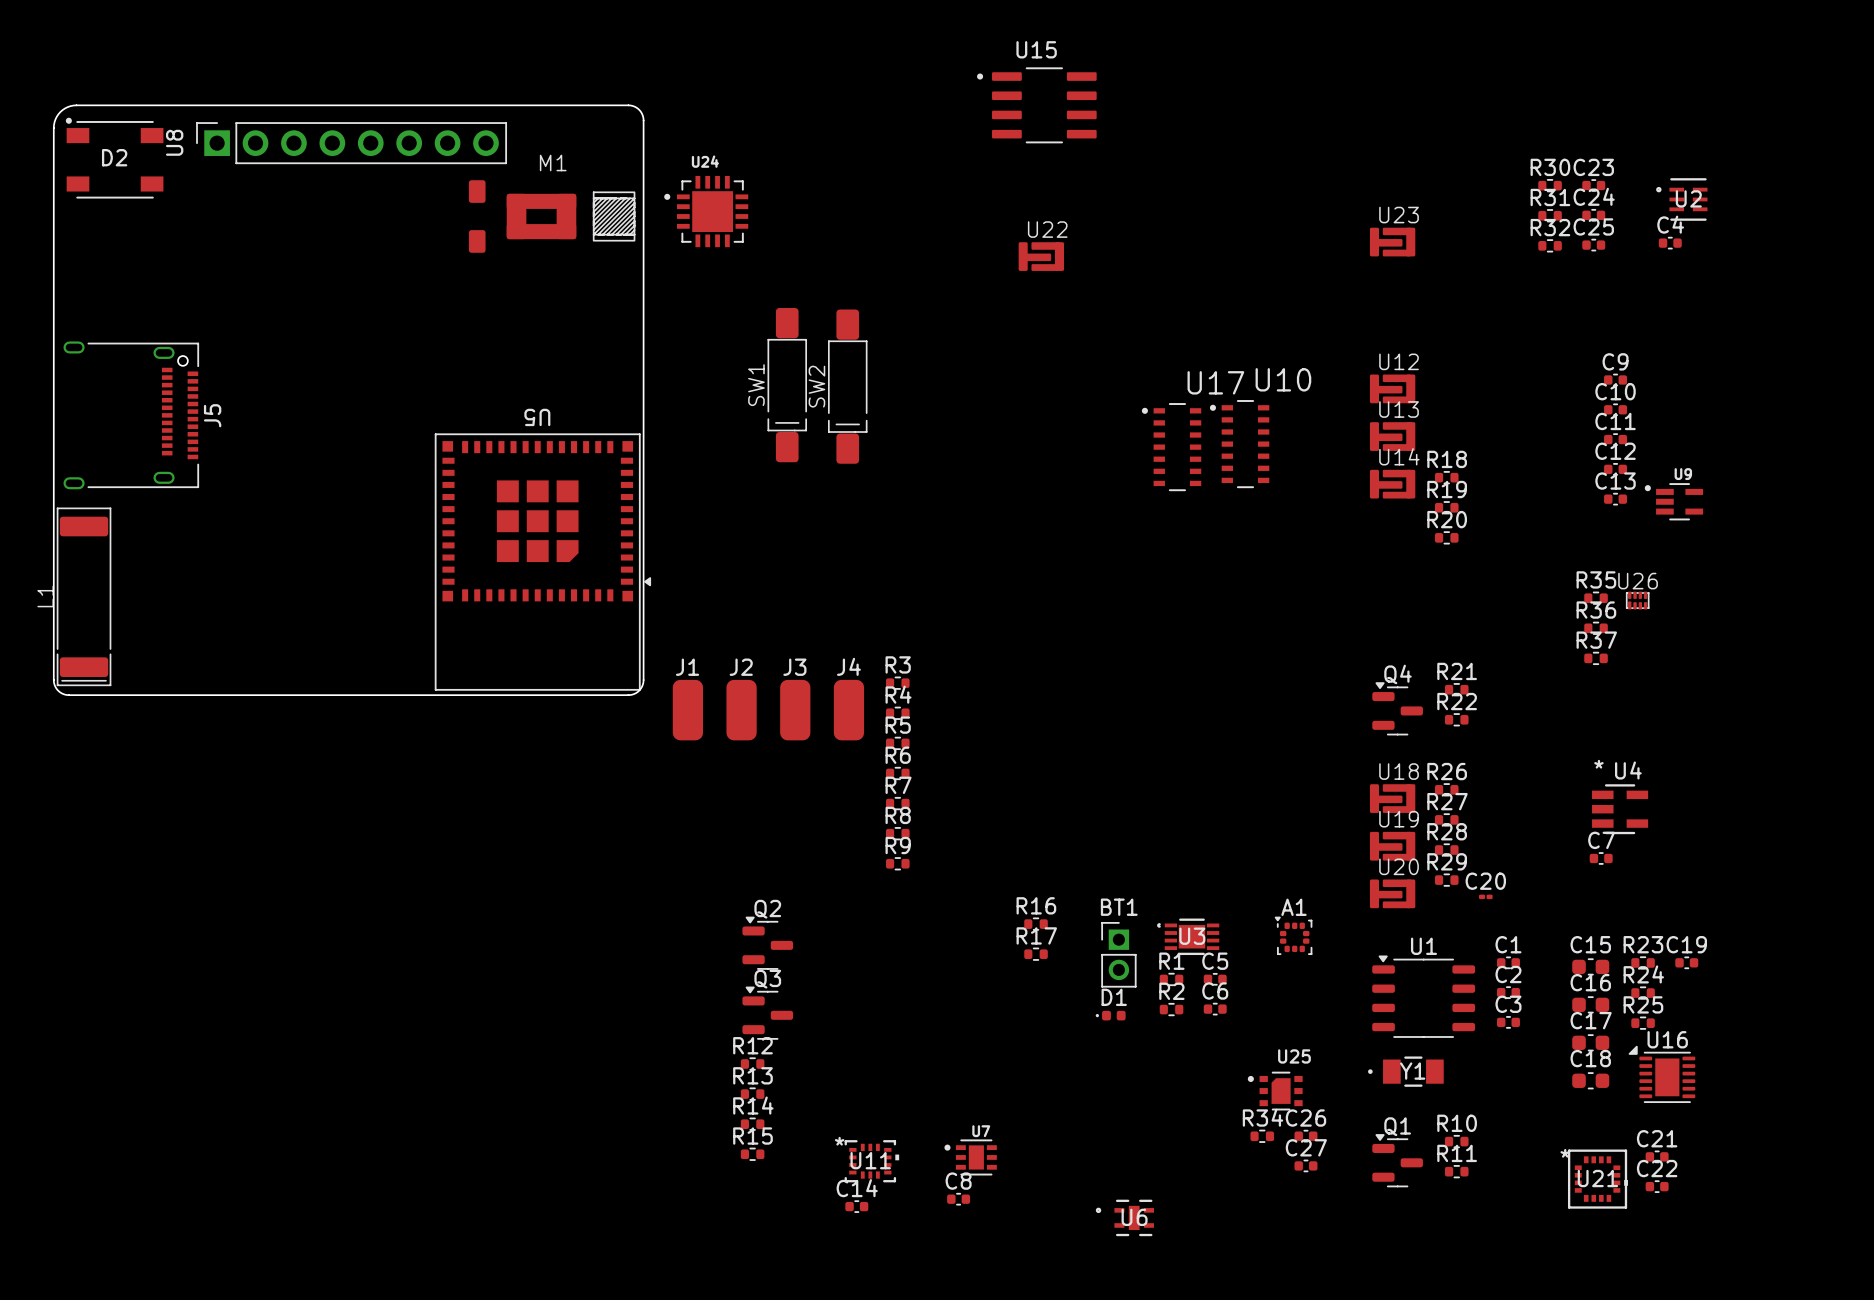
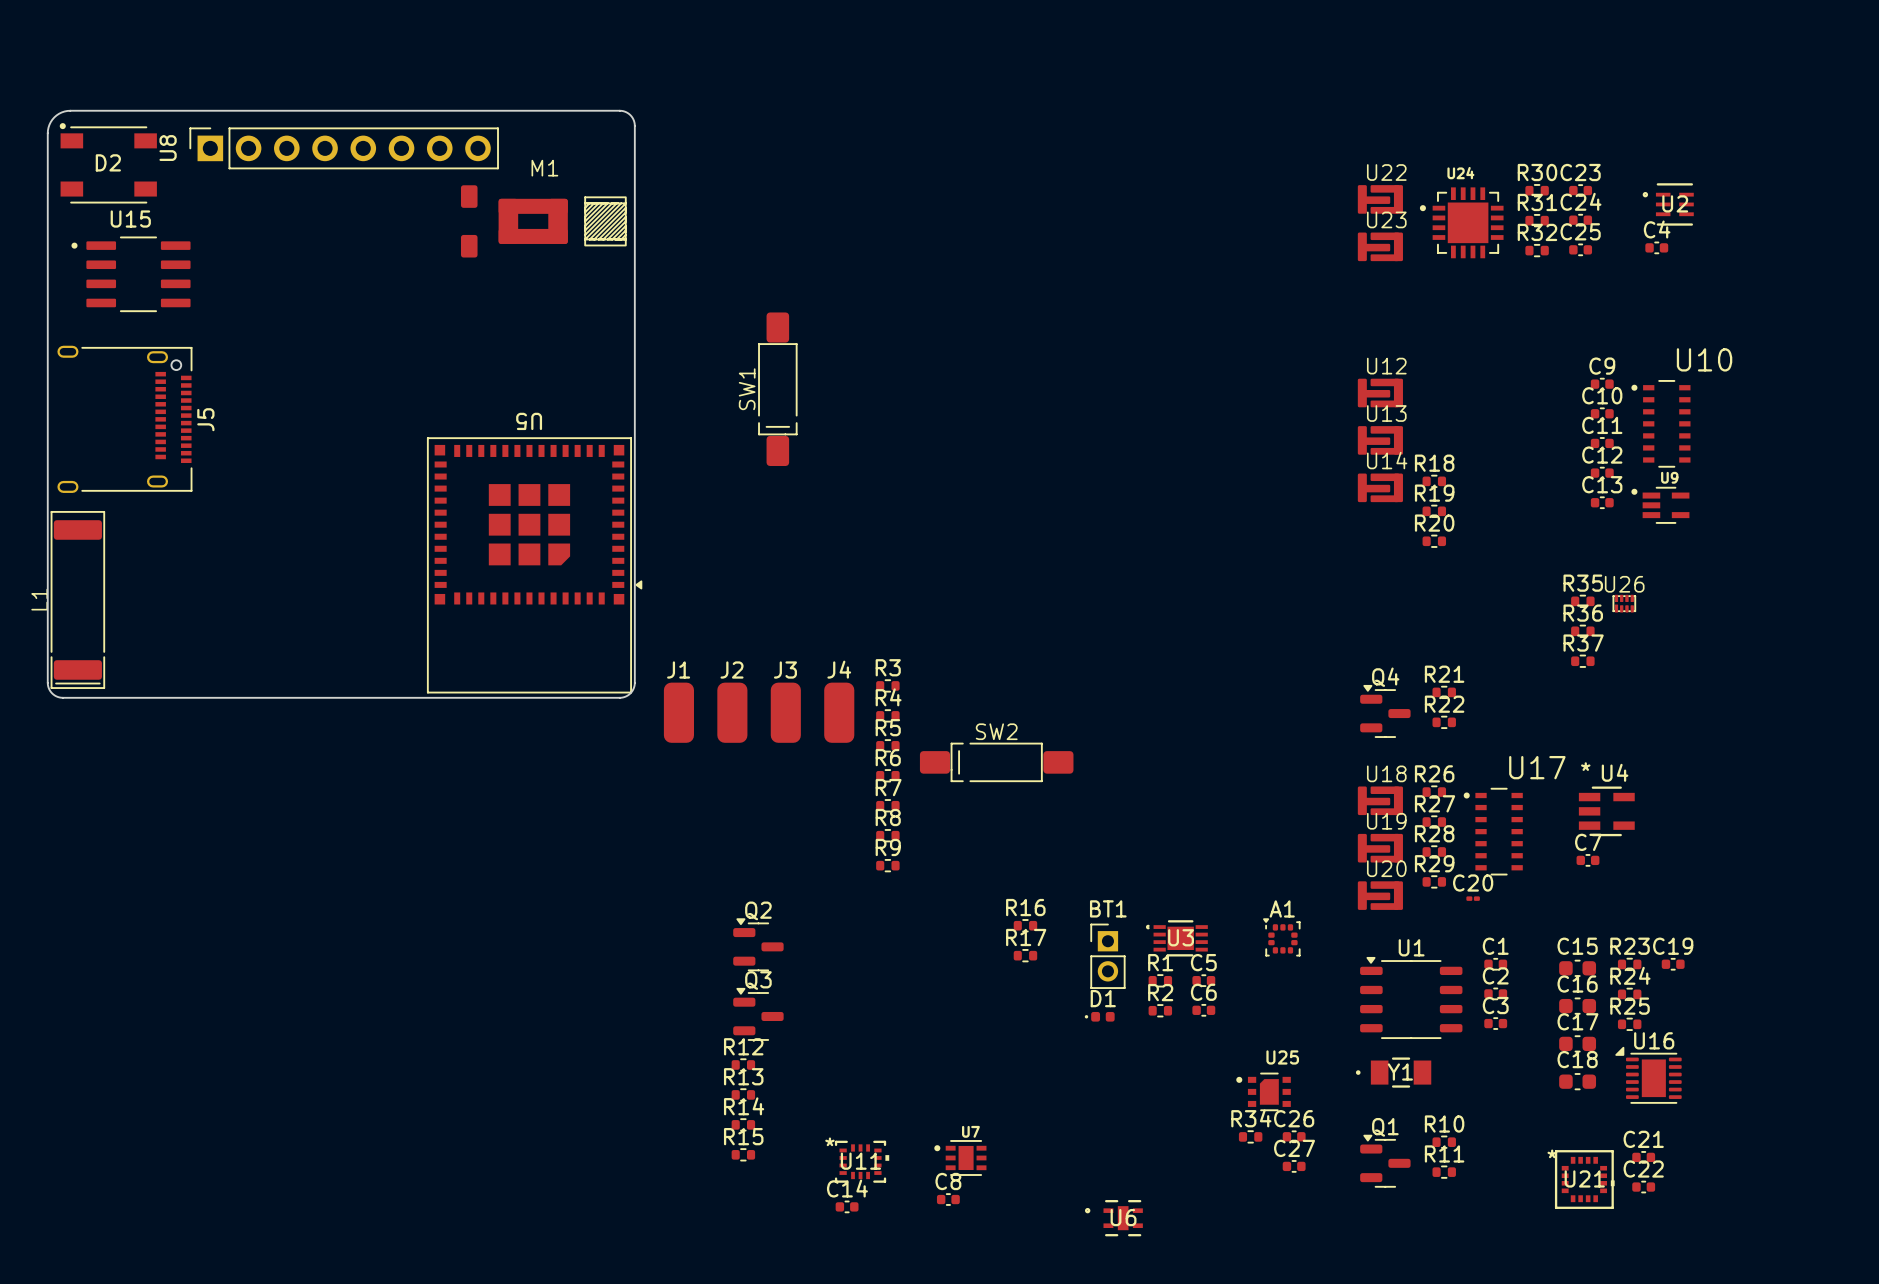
U15 position: (1036, 105) -> (131, 274)
U24 position: (706, 211) -> (1461, 222)
U22 position: (1041, 256) -> (1380, 199)
SW2 rotation: 0° (847, 386) -> 90° clockwise (996, 762)
SW2 position: (847, 386) -> (996, 762)
U10 position: (1239, 444) -> (1660, 423)
U17 position: (1171, 447) -> (1493, 831)

